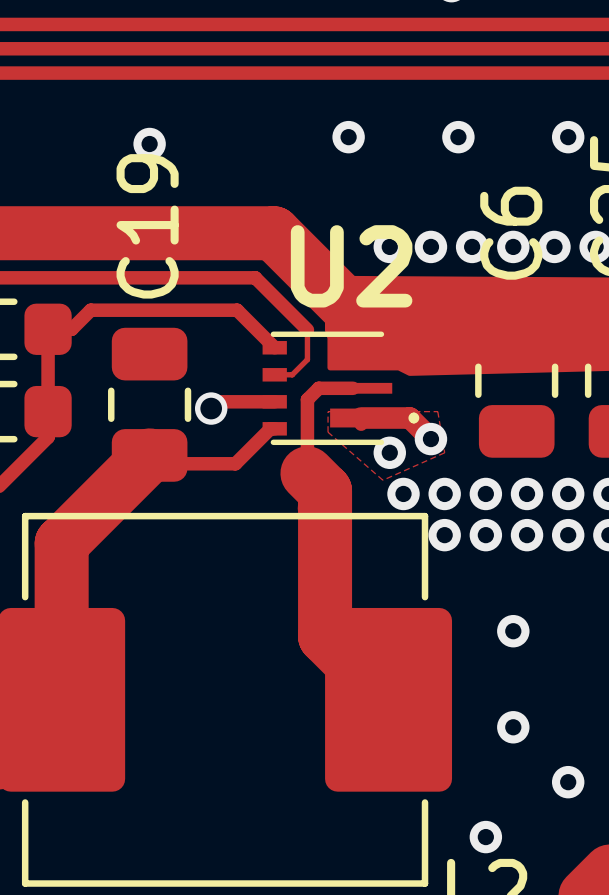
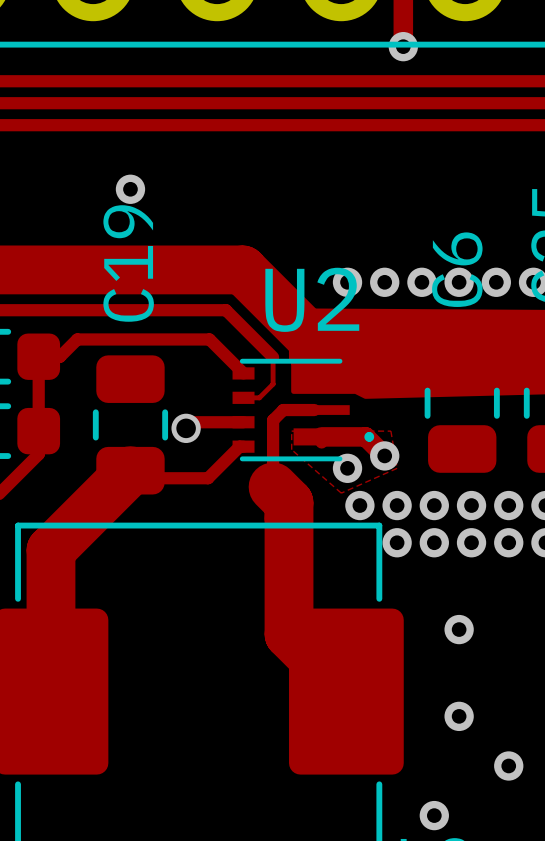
via: (348, 137) -> none
via: (458, 137) -> none
via: (568, 137) -> none

